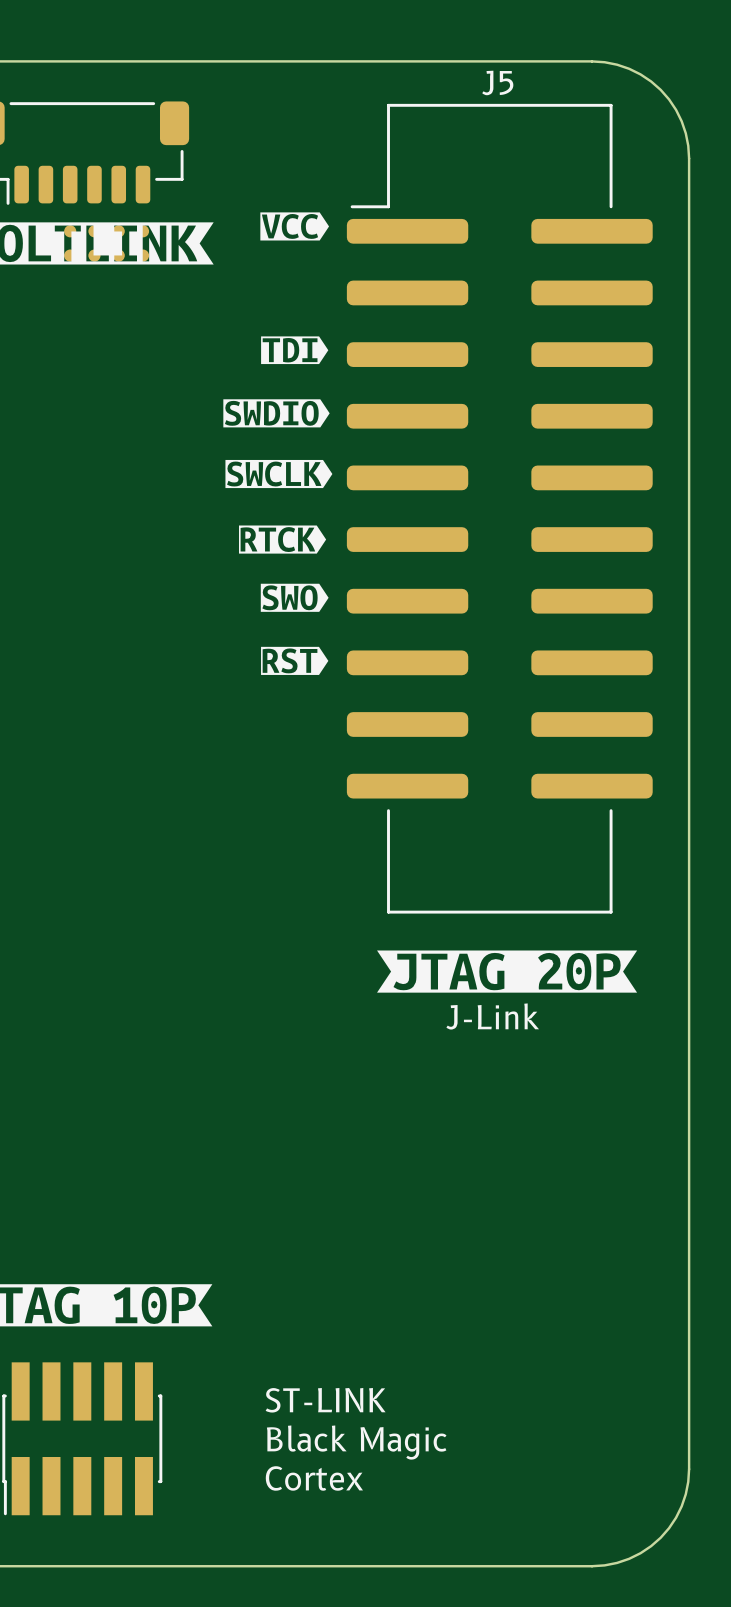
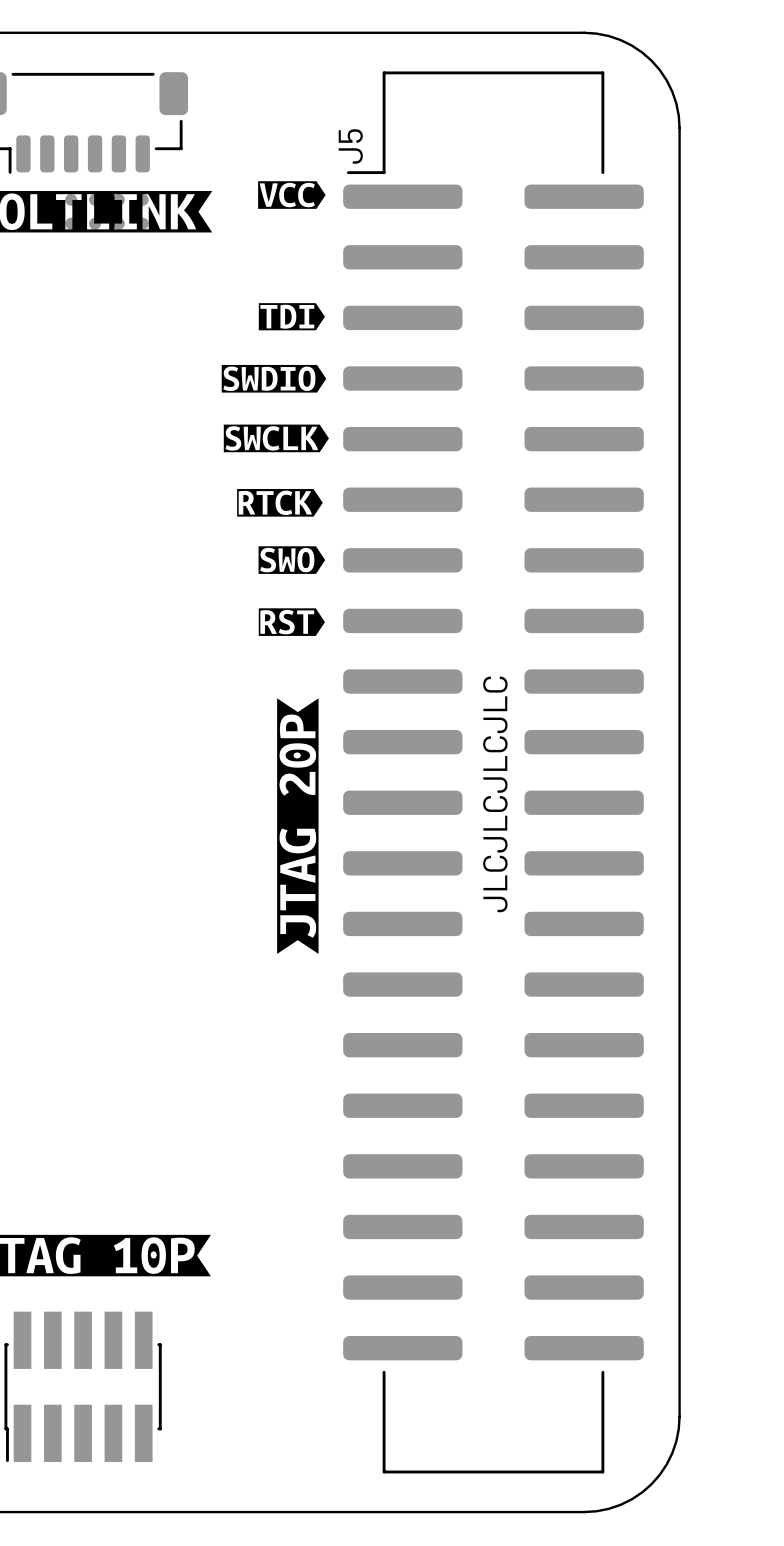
J5 name position: J5 (497, 82) -> J5 (350, 146)
J5 footprint: [346, 103, 653, 914] -> [343, 71, 644, 1474]
drawing: none -> [277, 698, 319, 954]
text: none -> JLCJLCJLCJLC (495, 794)
drawing: [377, 950, 638, 993] -> none
text: J-Link (492, 1016) -> none
text: ST-LINK (325, 1400) -> none
text: Black Magic (356, 1442) -> none
text: Cortex (314, 1478) -> none

